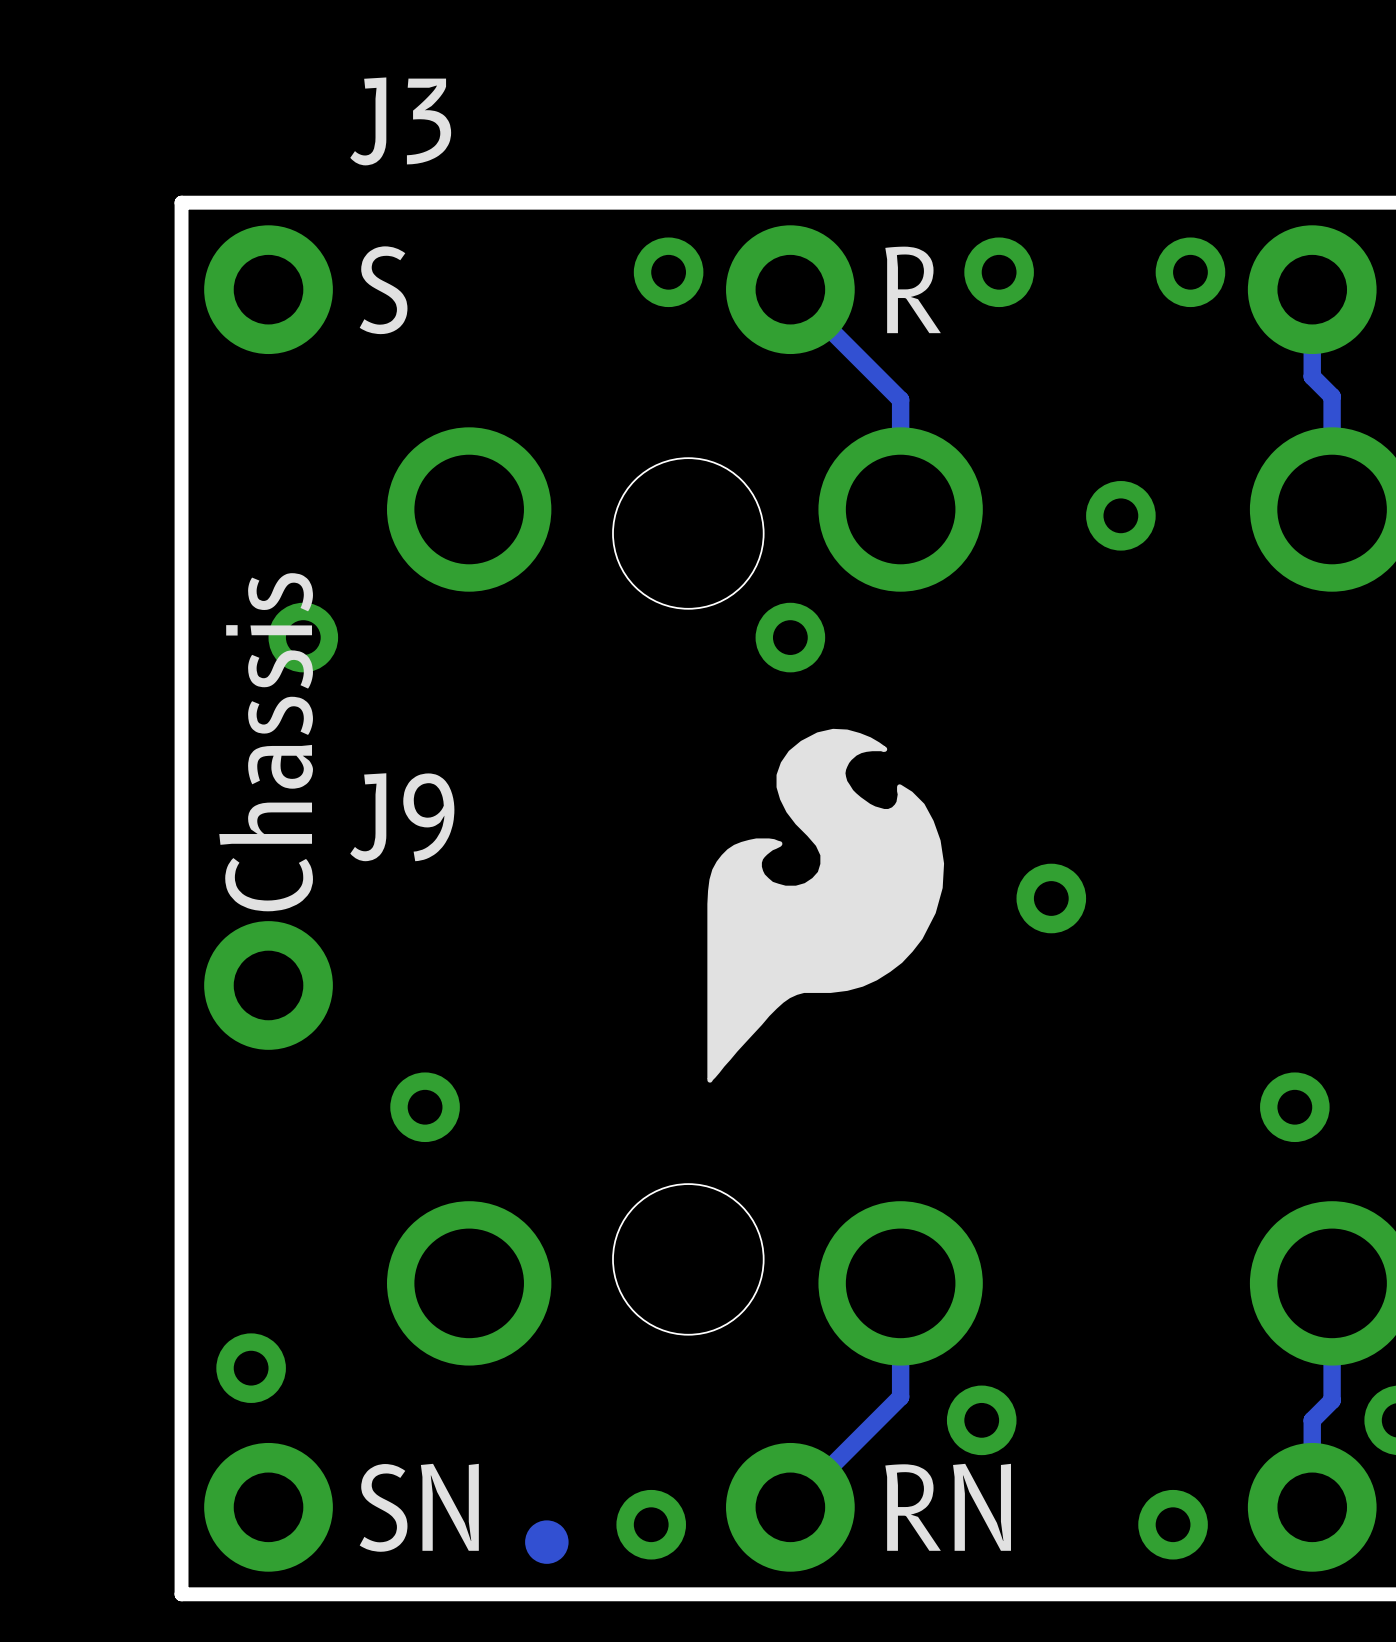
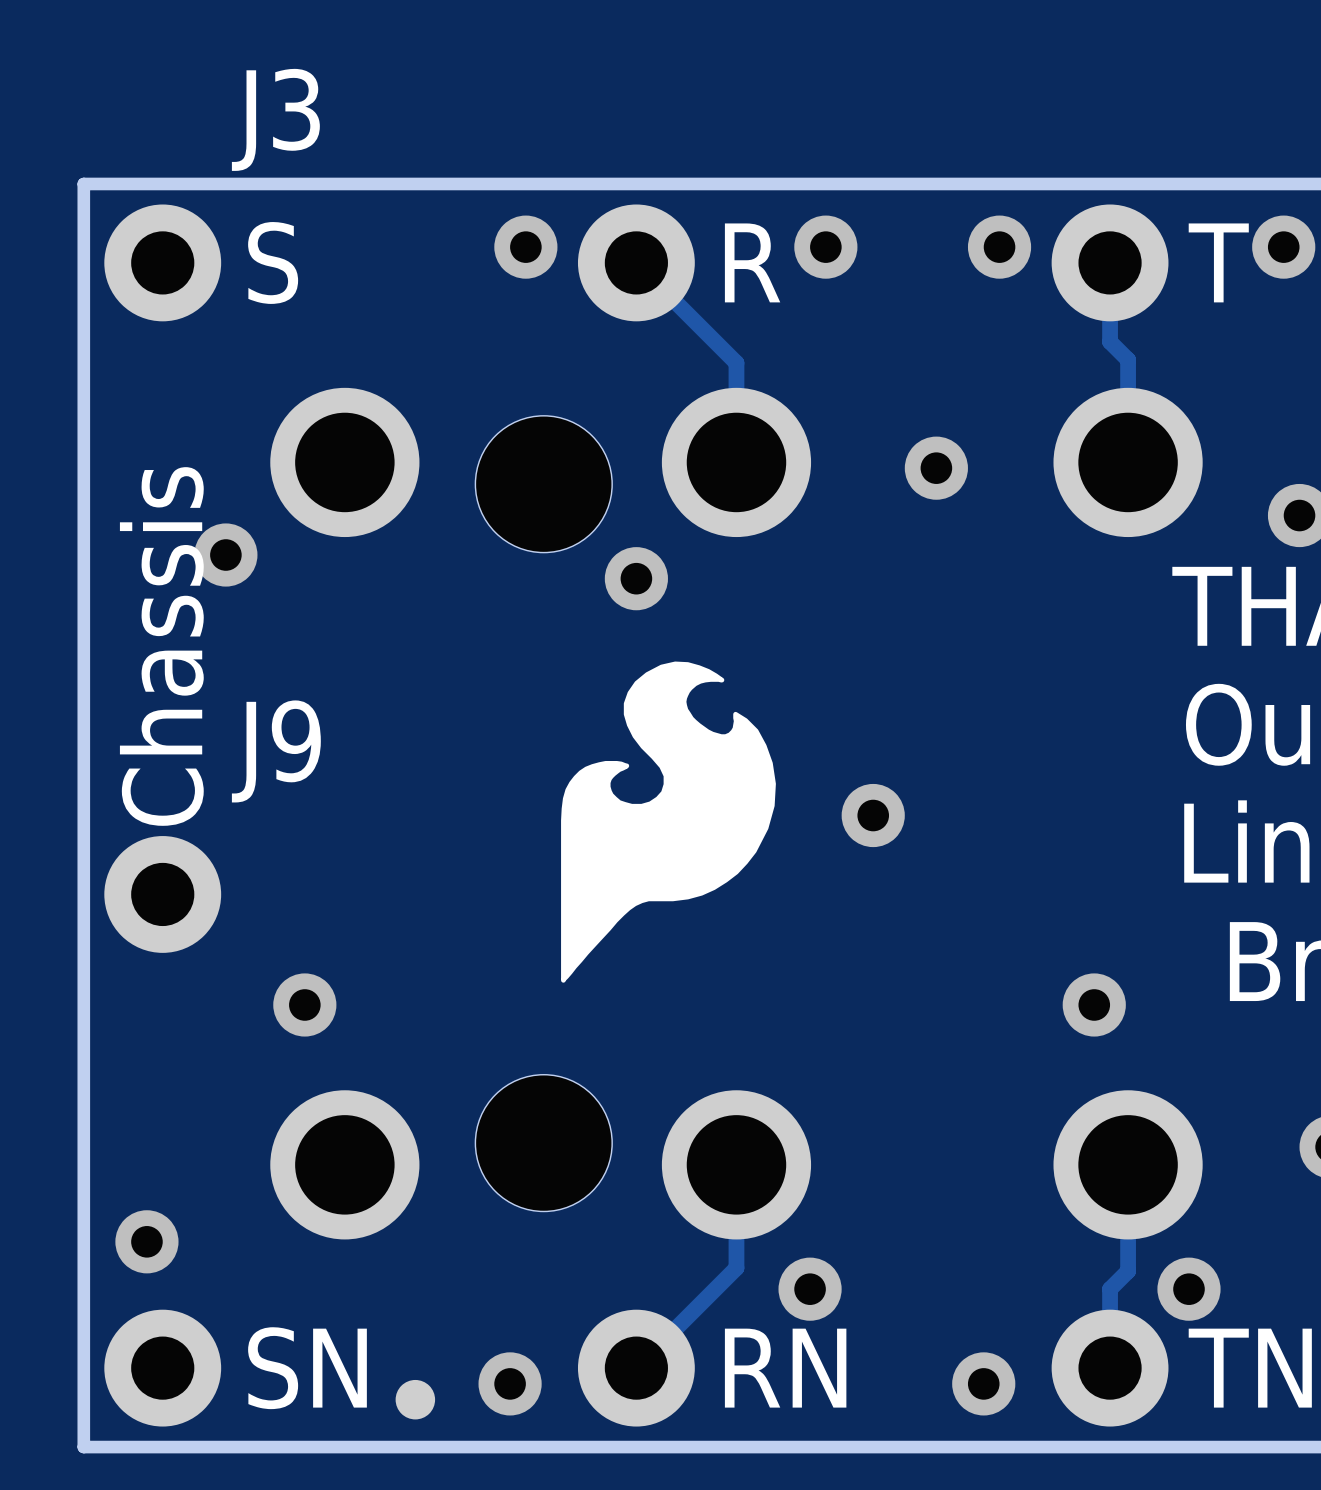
via position: (303, 637) -> (225, 555)

